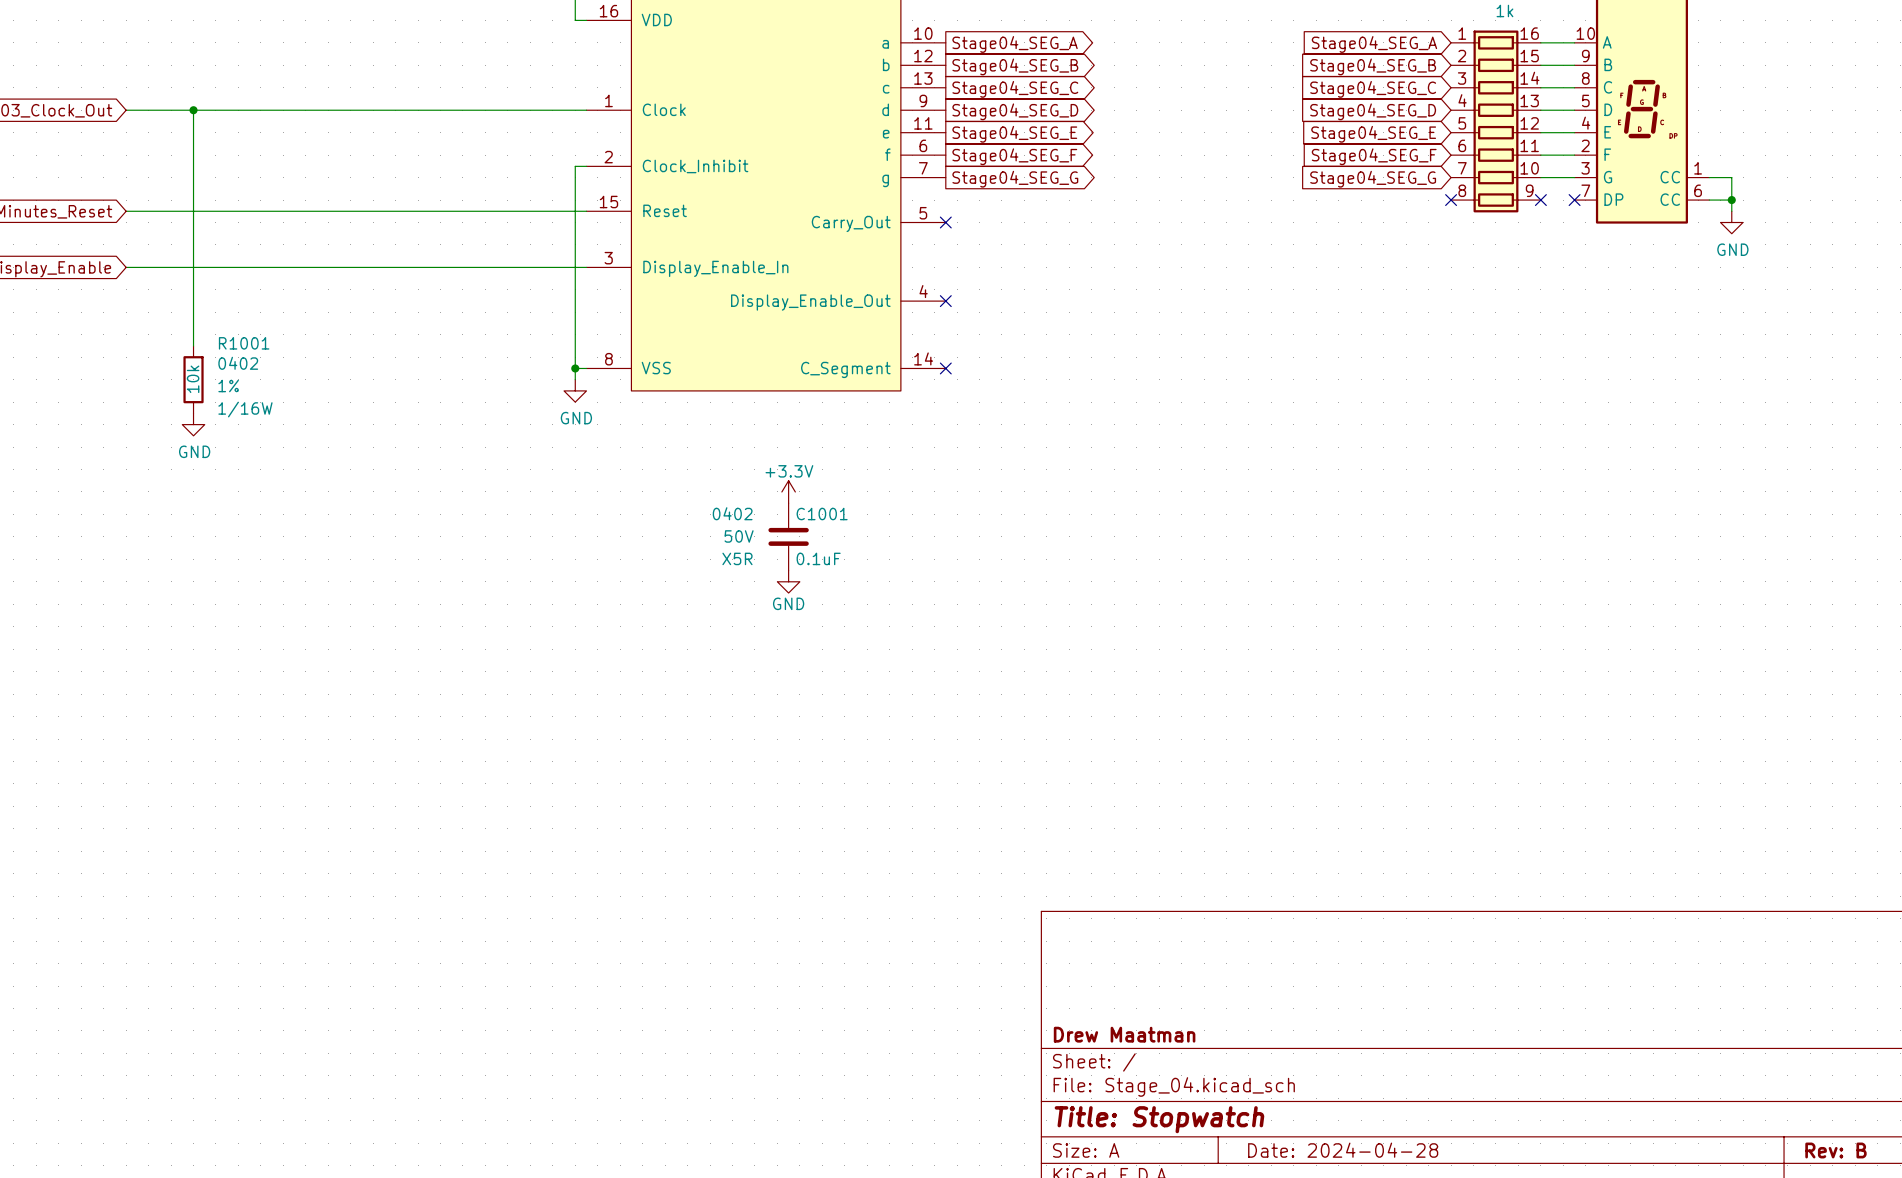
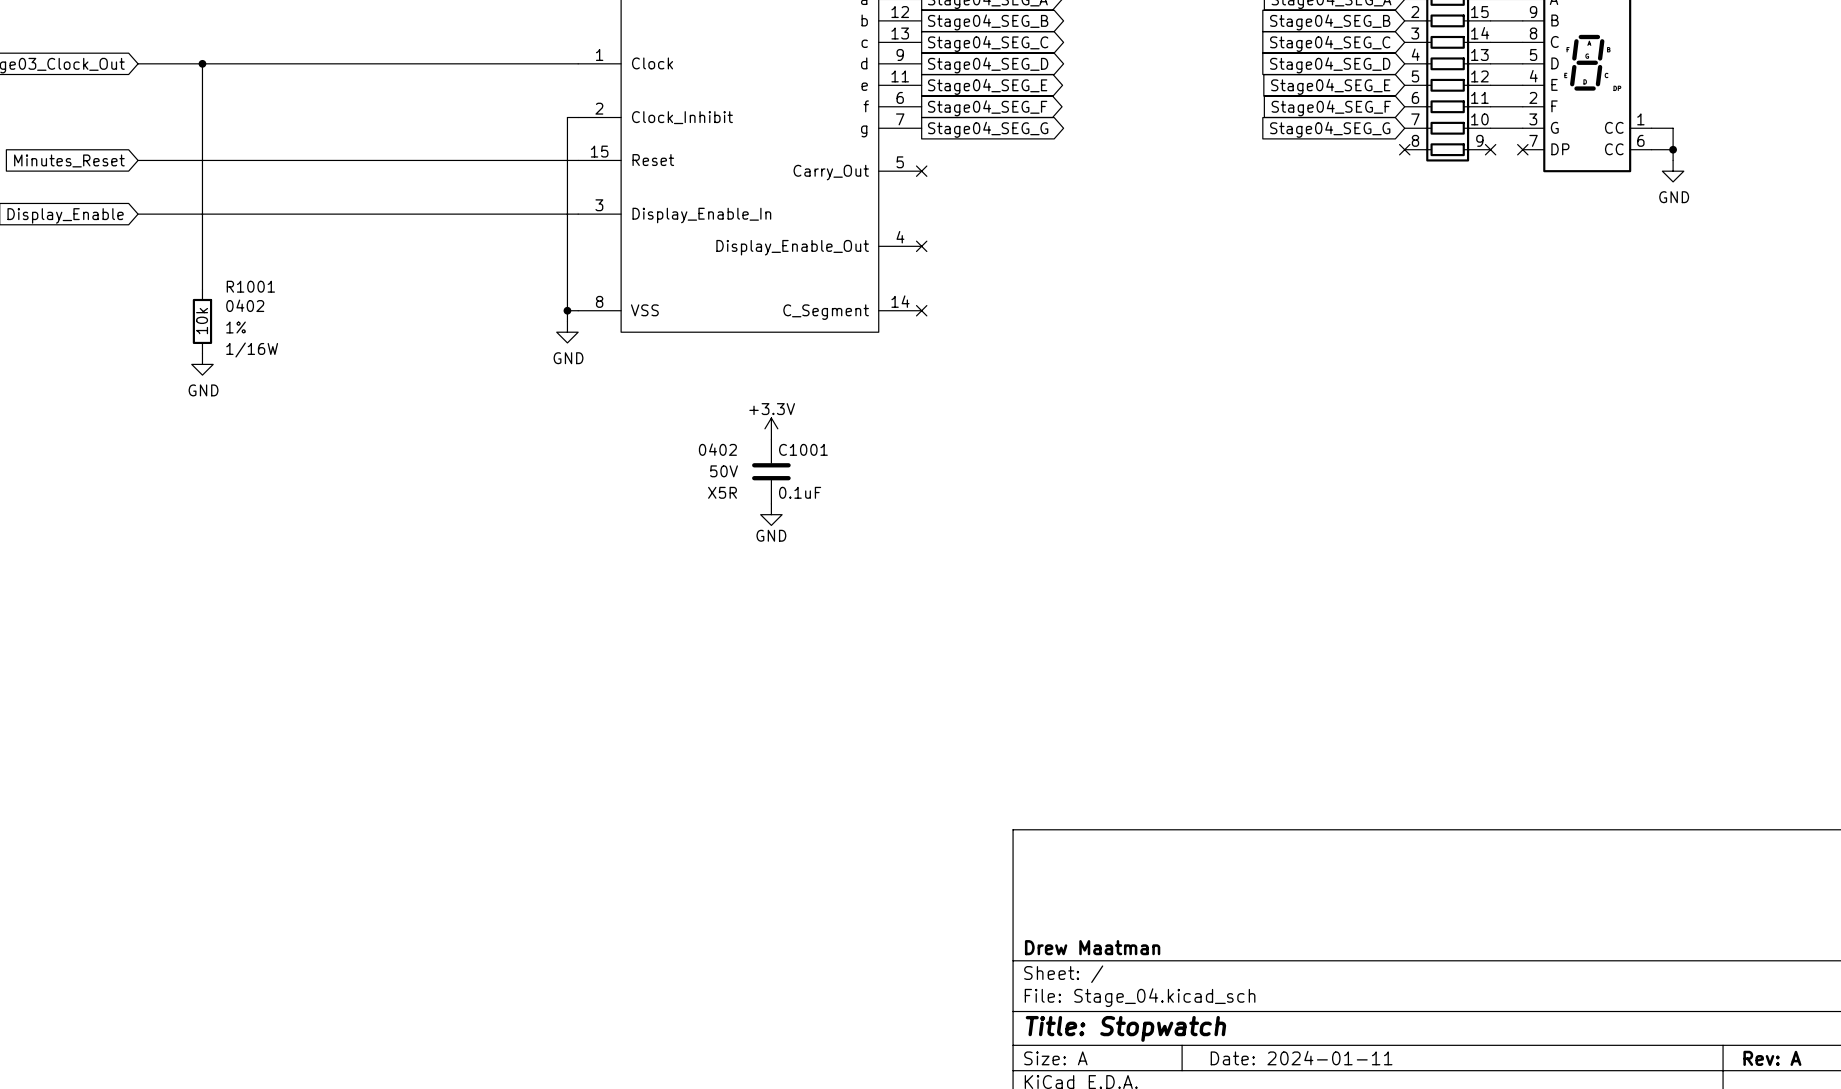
title block: Date: 2024-04-28 (1343, 1150) -> Date: 2024-01-11 (1301, 1058)
title block: Rev: B (1835, 1150) -> Rev: A (1772, 1058)

